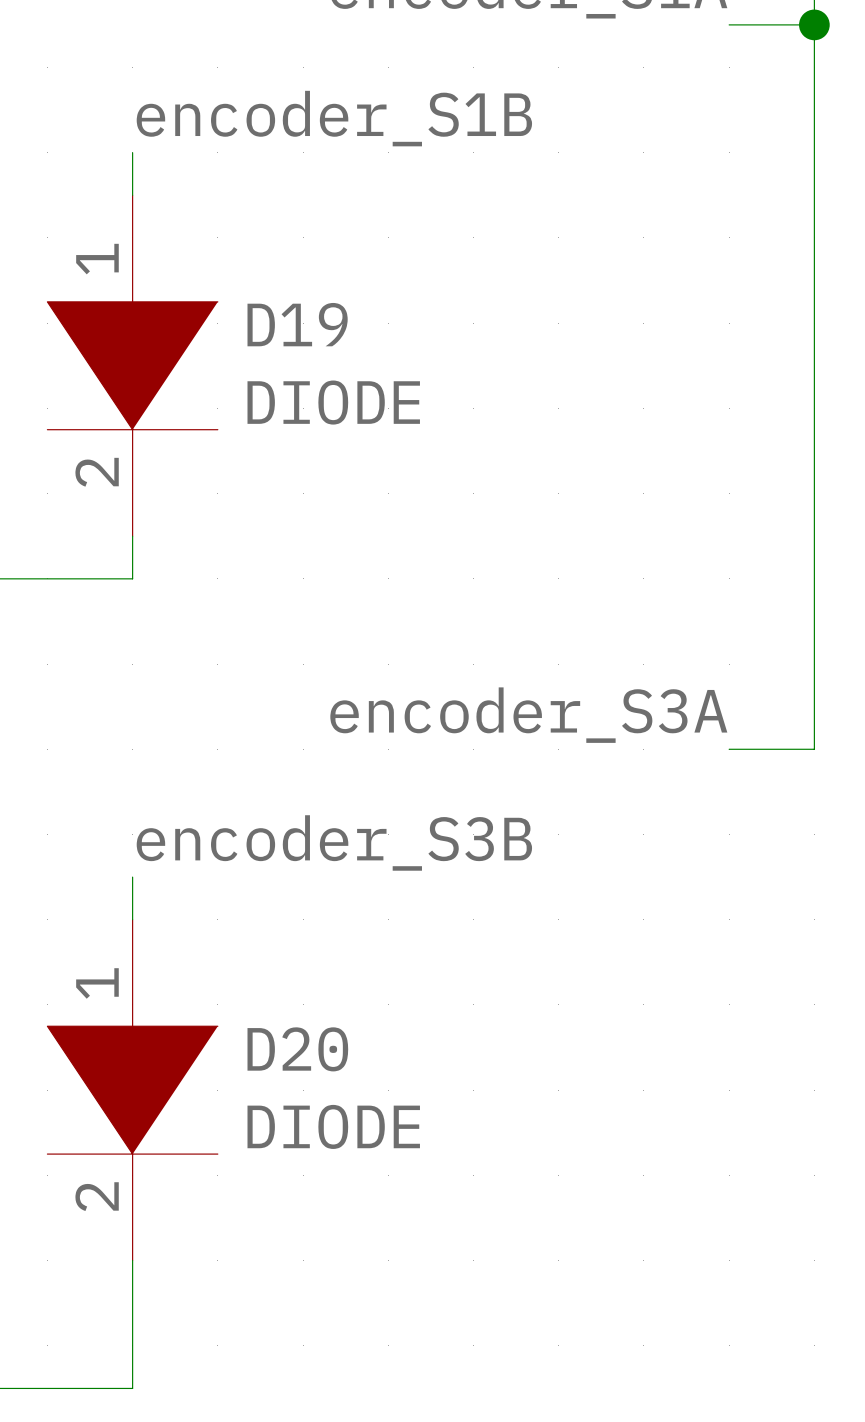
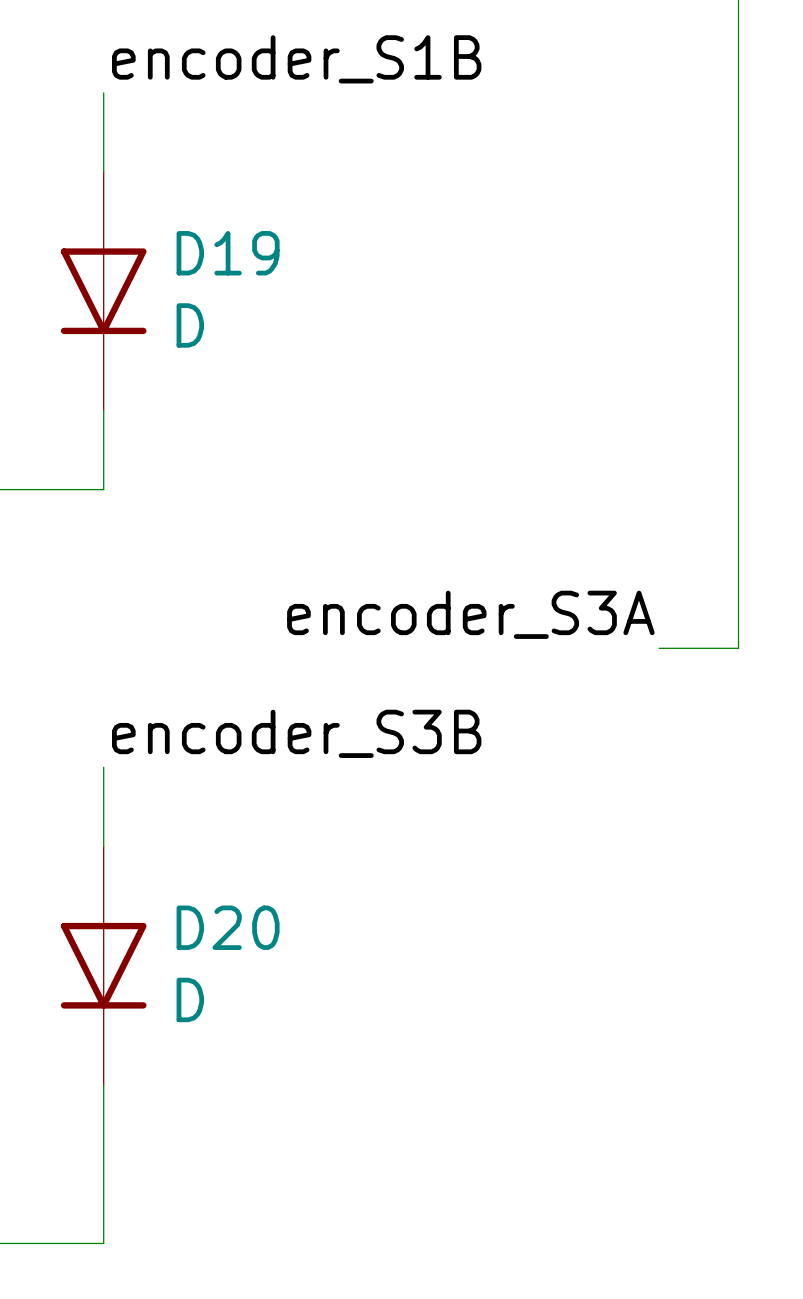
D19 symbol: [47, 195, 218, 537] -> [60, 172, 147, 411]
D19 value: DIODE (333, 402) -> D (190, 325)
D20 symbol: [47, 919, 218, 1261] -> [60, 846, 147, 1085]
D20 value: DIODE (333, 1126) -> D (190, 999)

